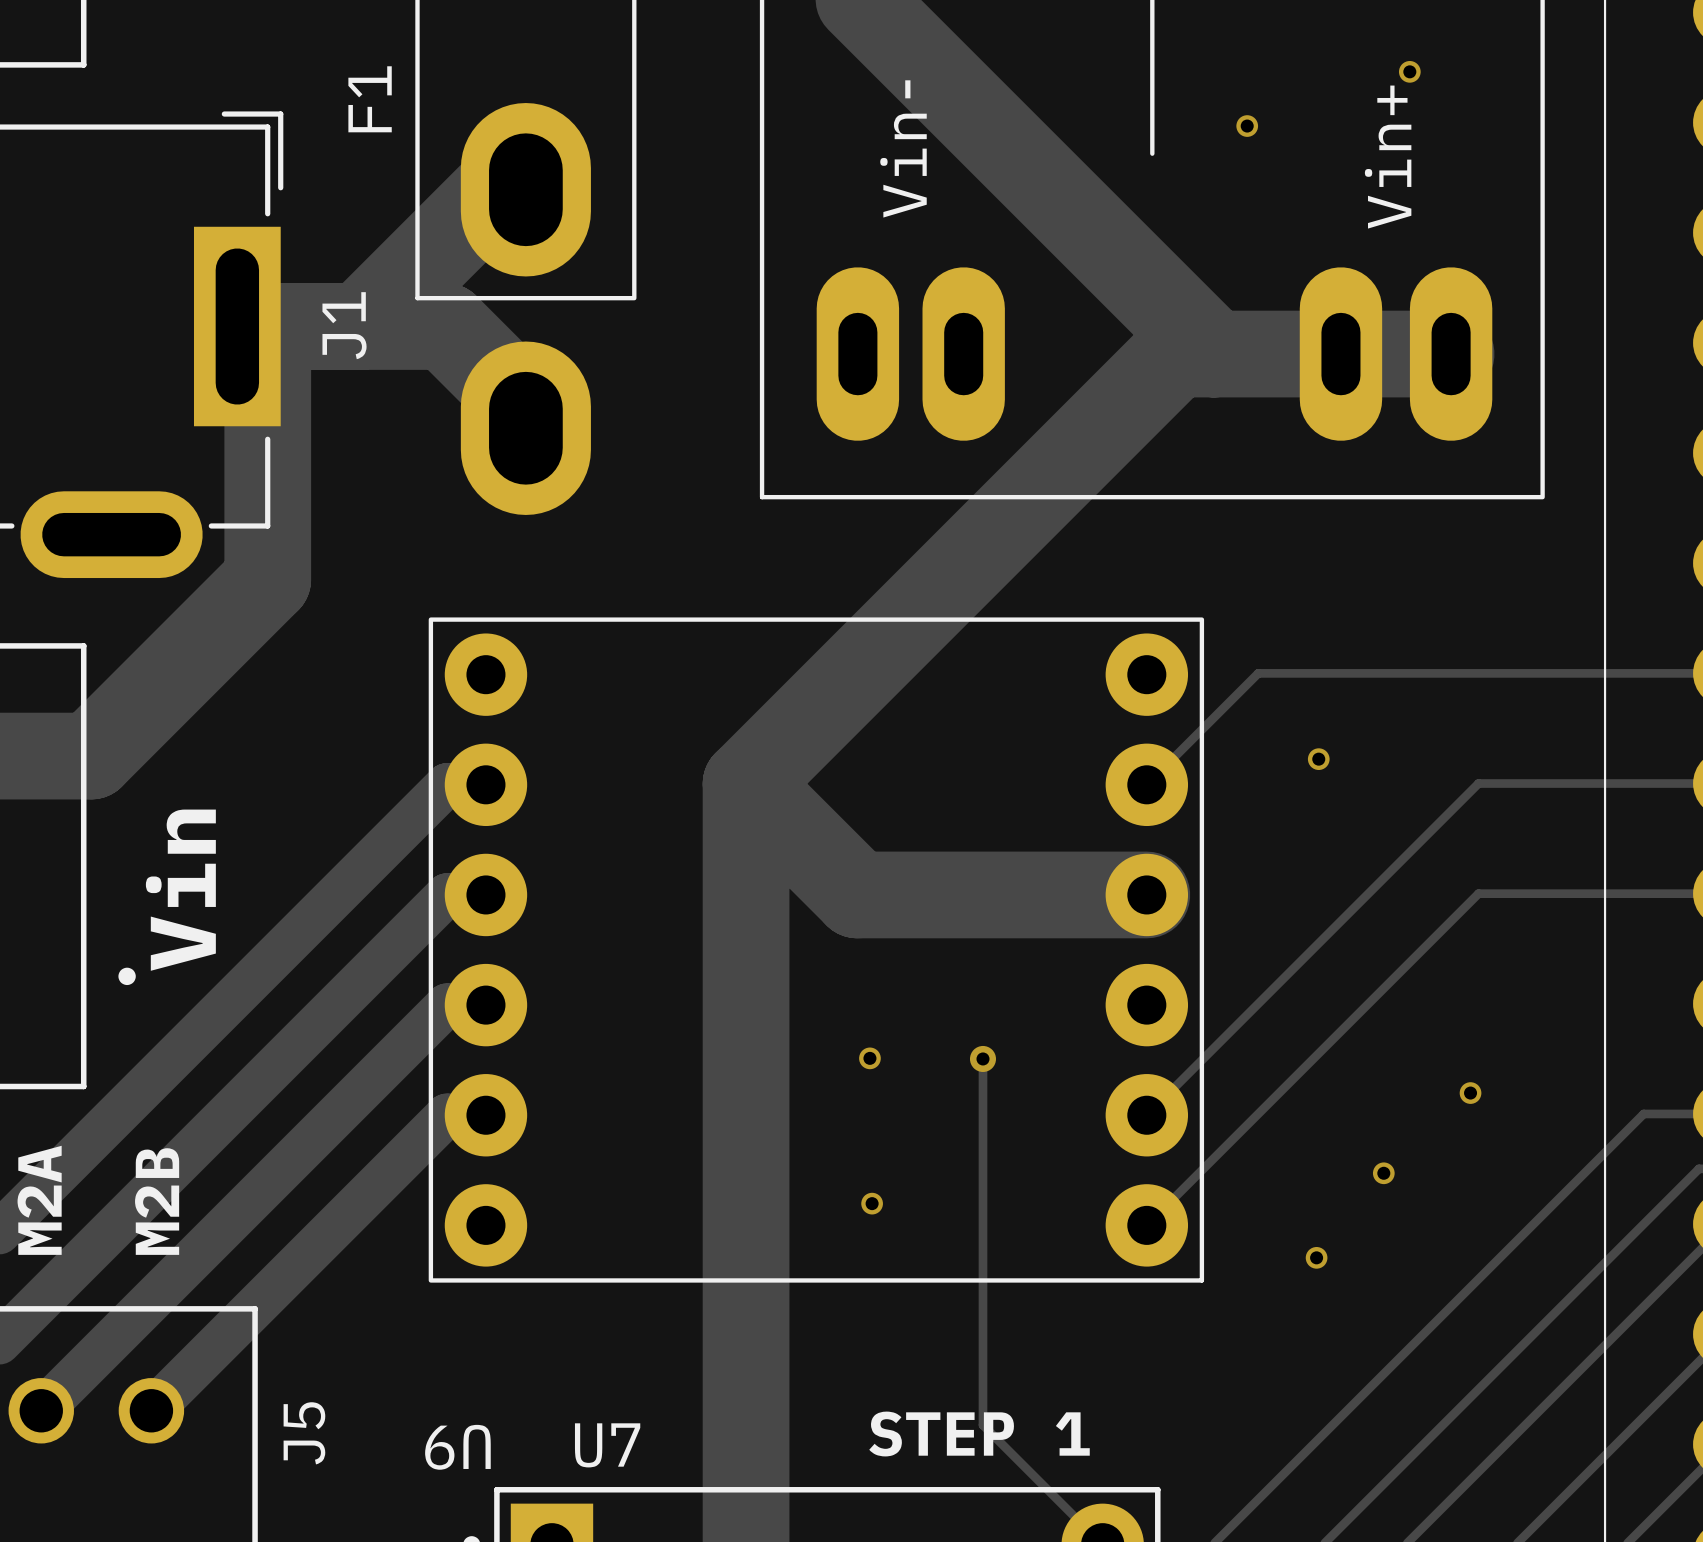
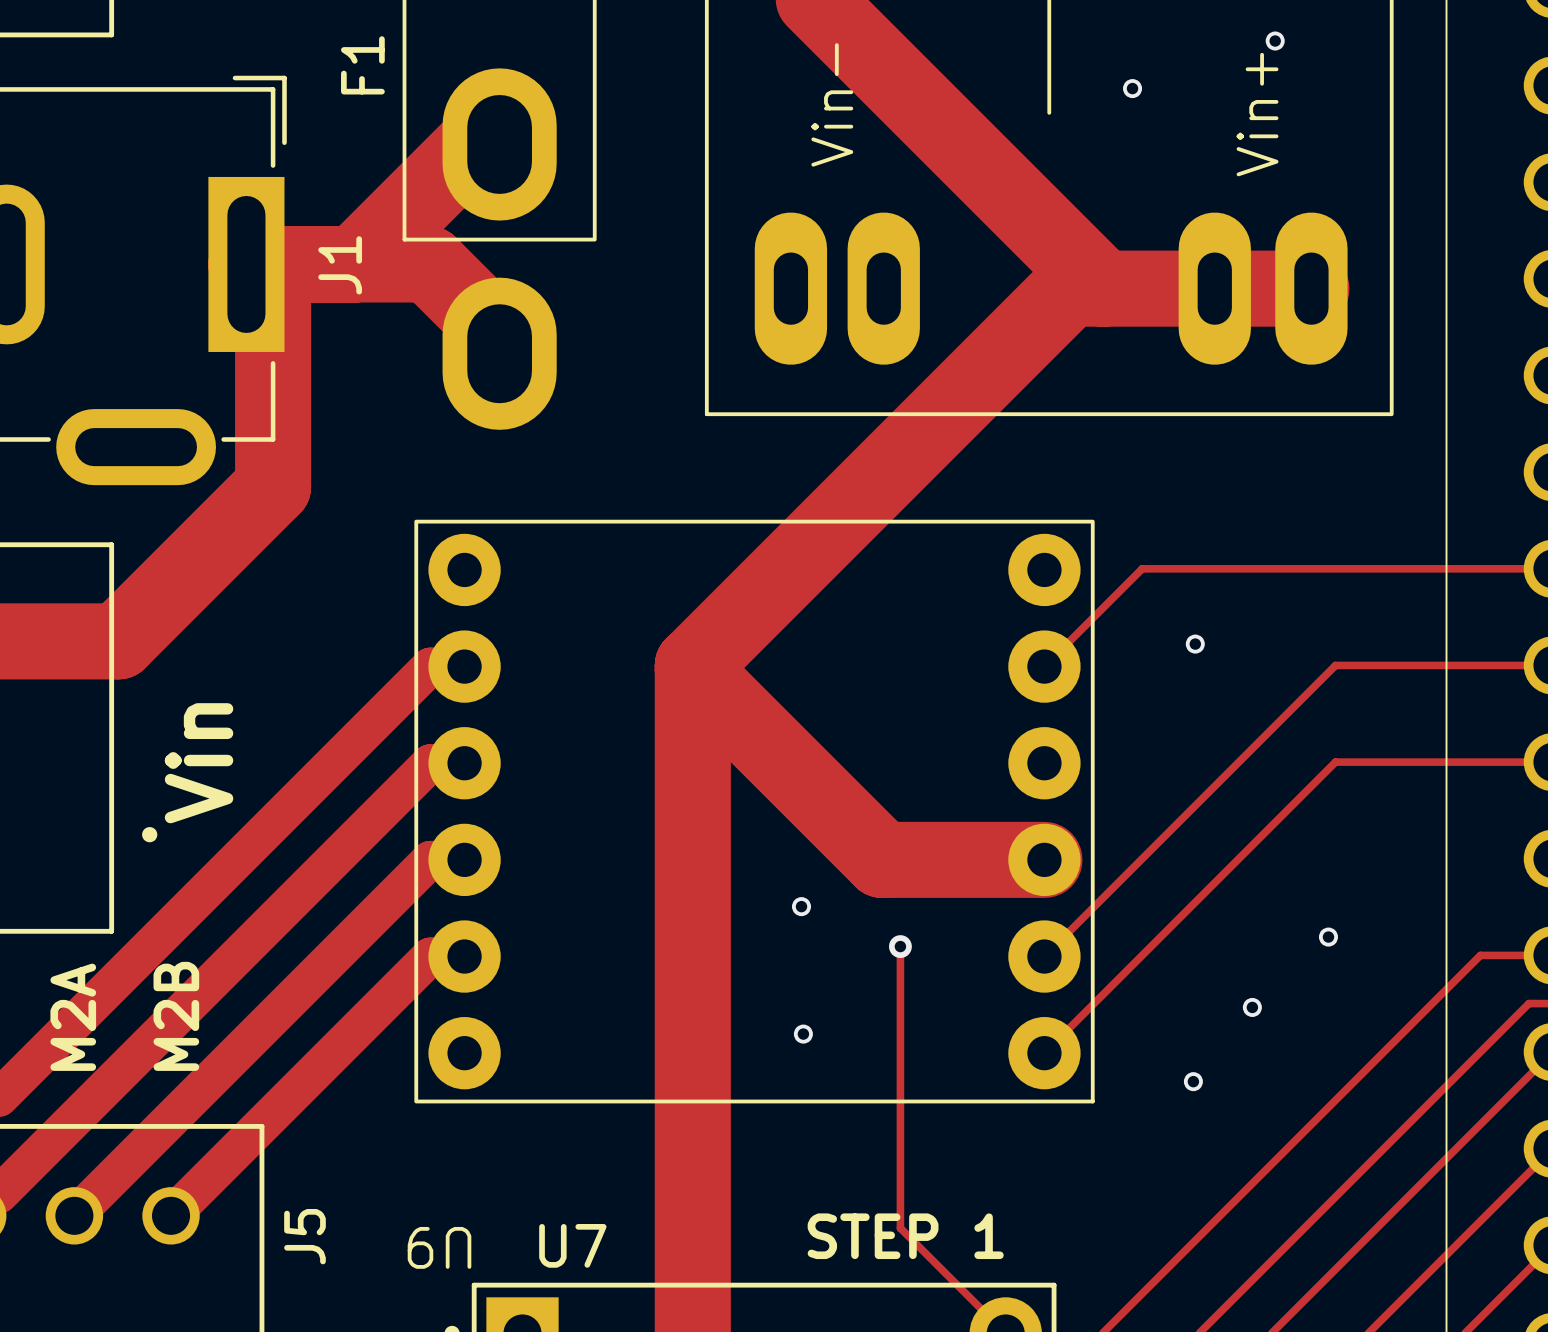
track: (746, 783) (857, 894) (1146, 894) -> none
track: none -> (692, 670) (882, 859) (1044, 859)
track: (982, 1058) (982, 1425) -> (900, 946) (900, 1228)
via position: (982, 1058) -> (900, 946)

